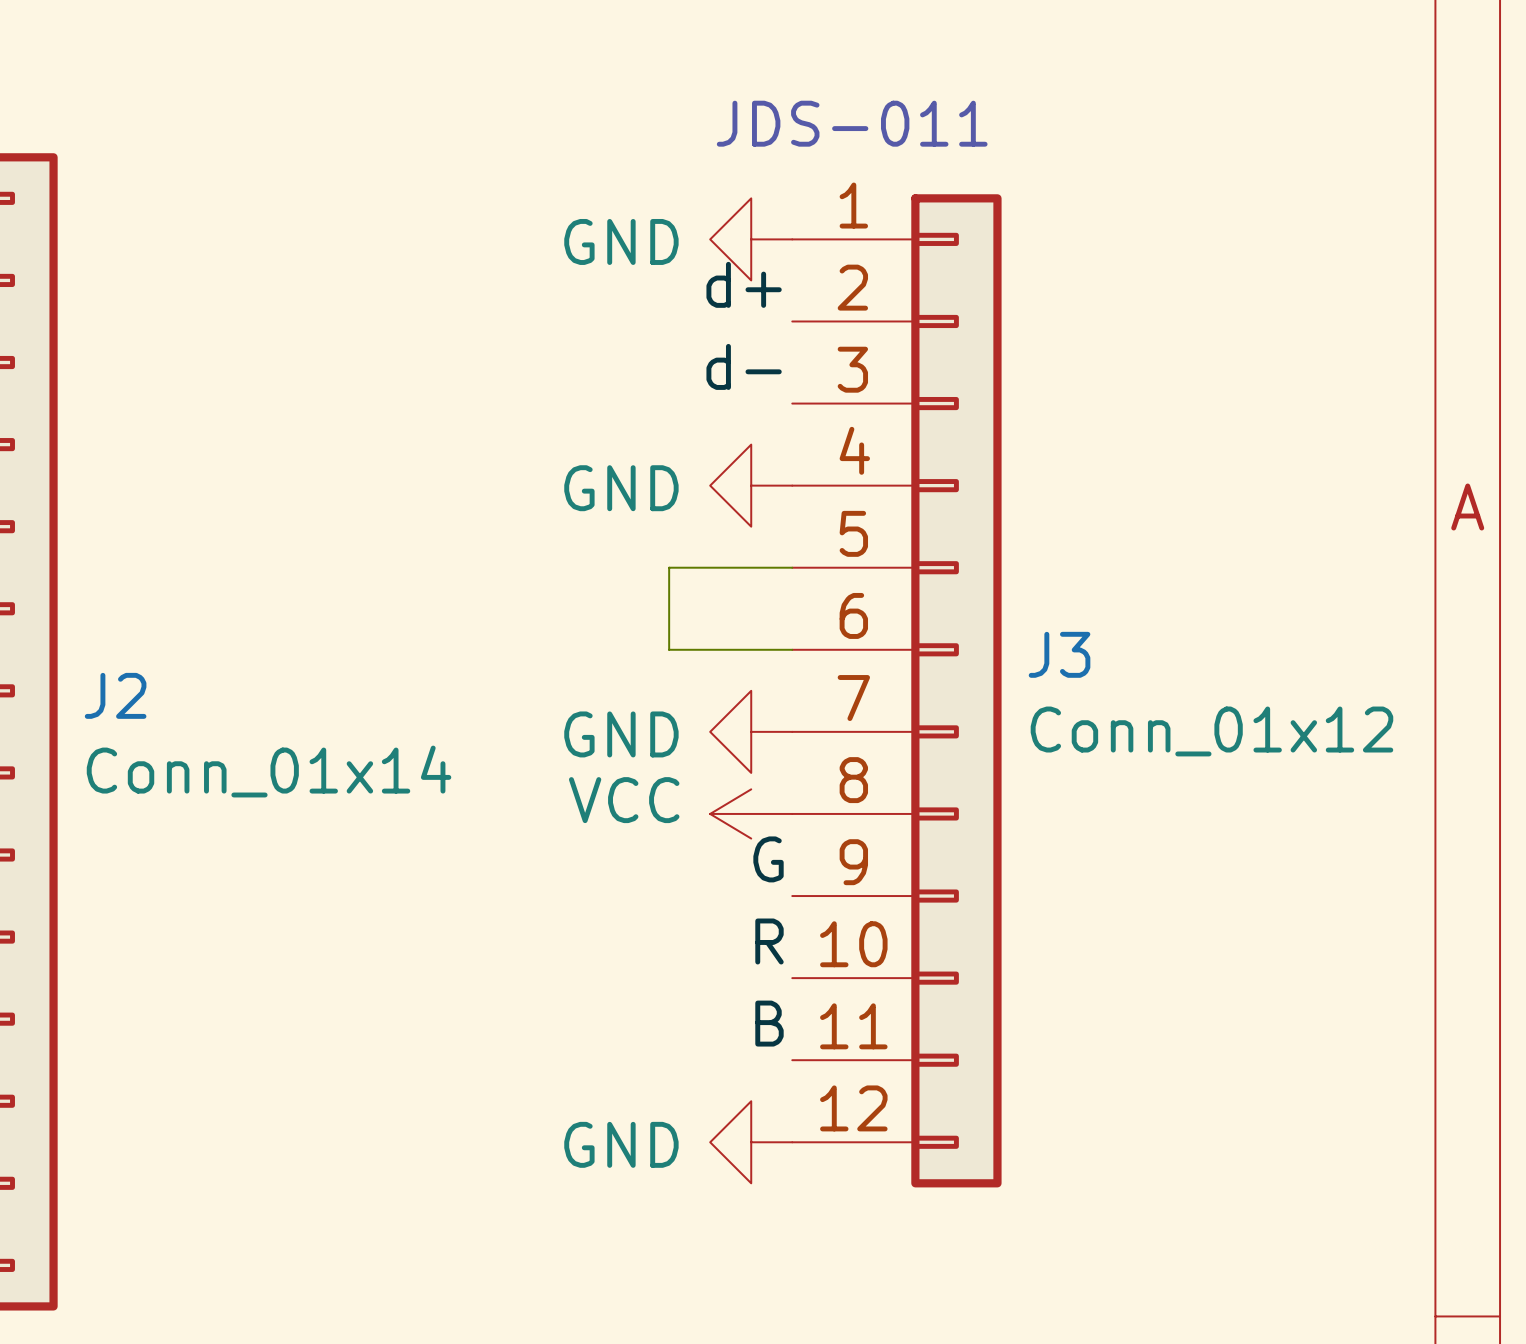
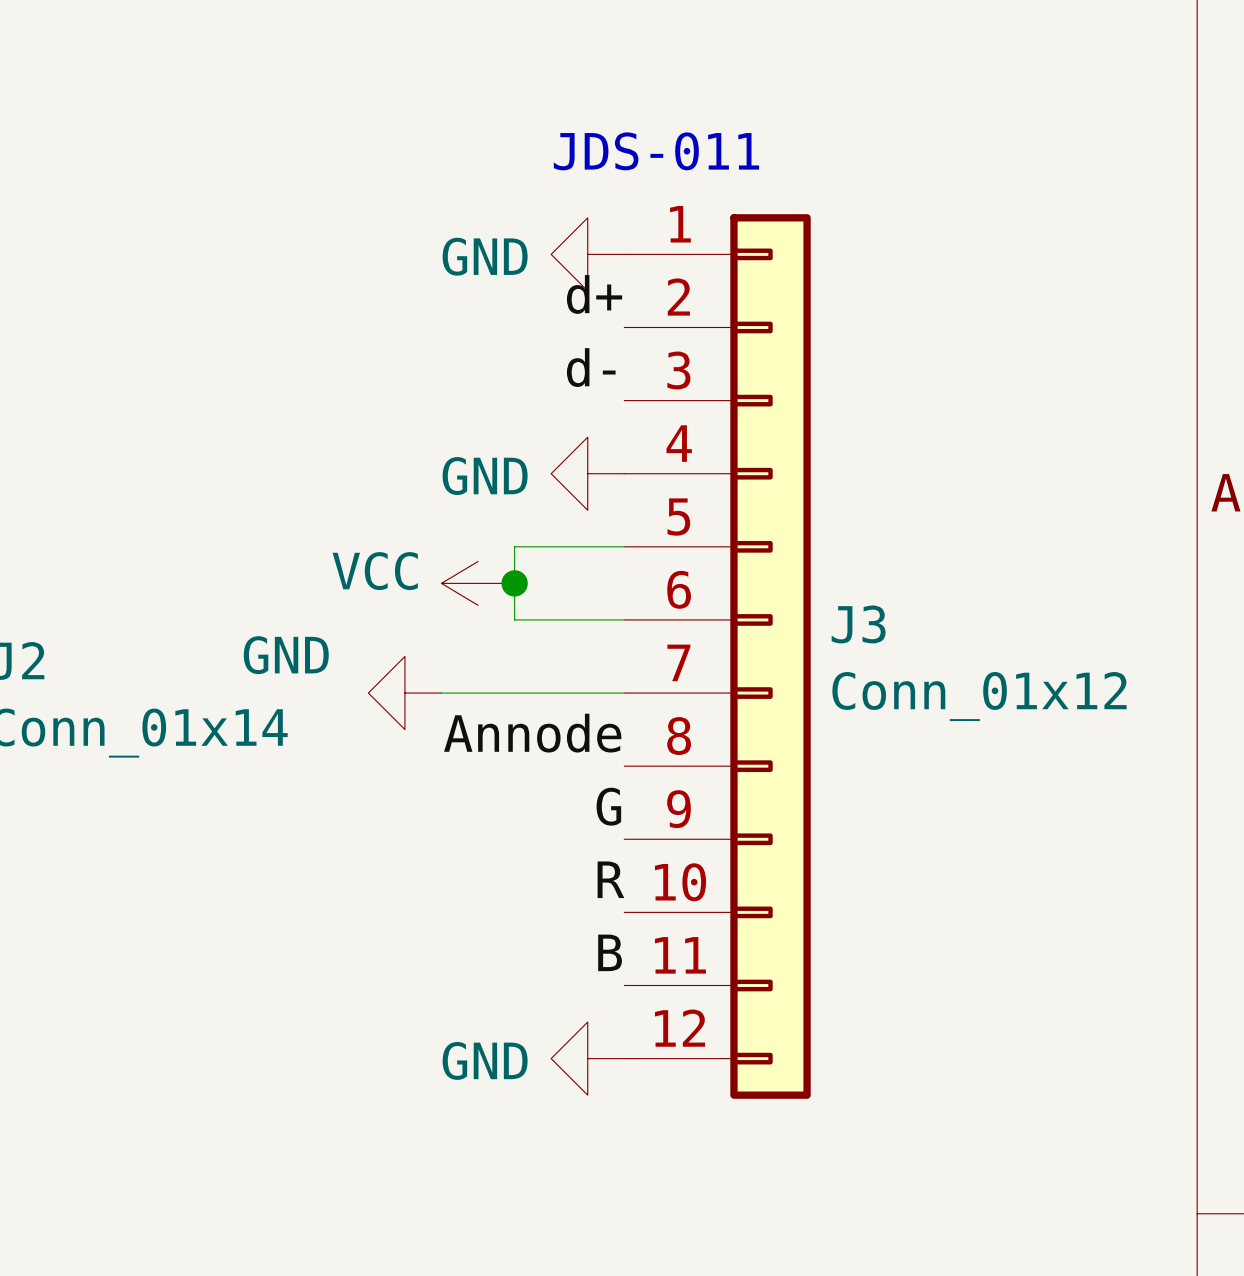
junction: none -> (514, 583)
wire: none -> (441, 693) (624, 693)
power symbol position: GND (751, 731) -> GND (404, 693)
power symbol text position: GND (621, 734) -> GND (286, 655)
label: none -> Annode (532, 733)
power symbol position: VCC (751, 813) -> VCC (478, 583)

